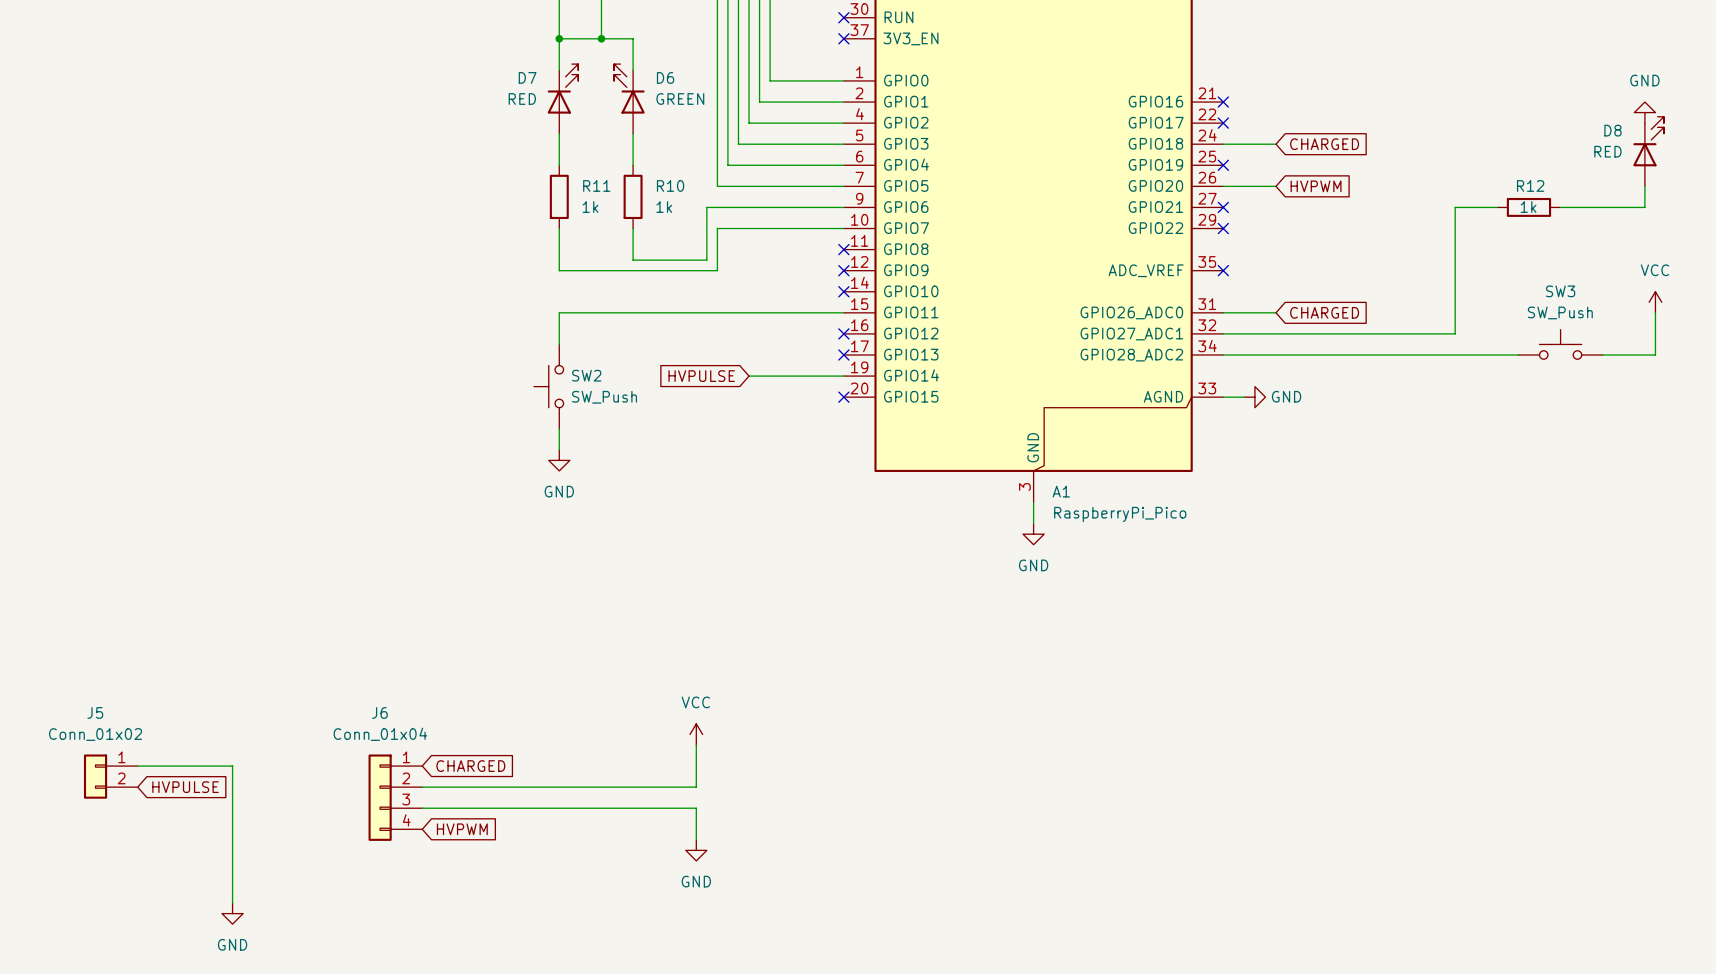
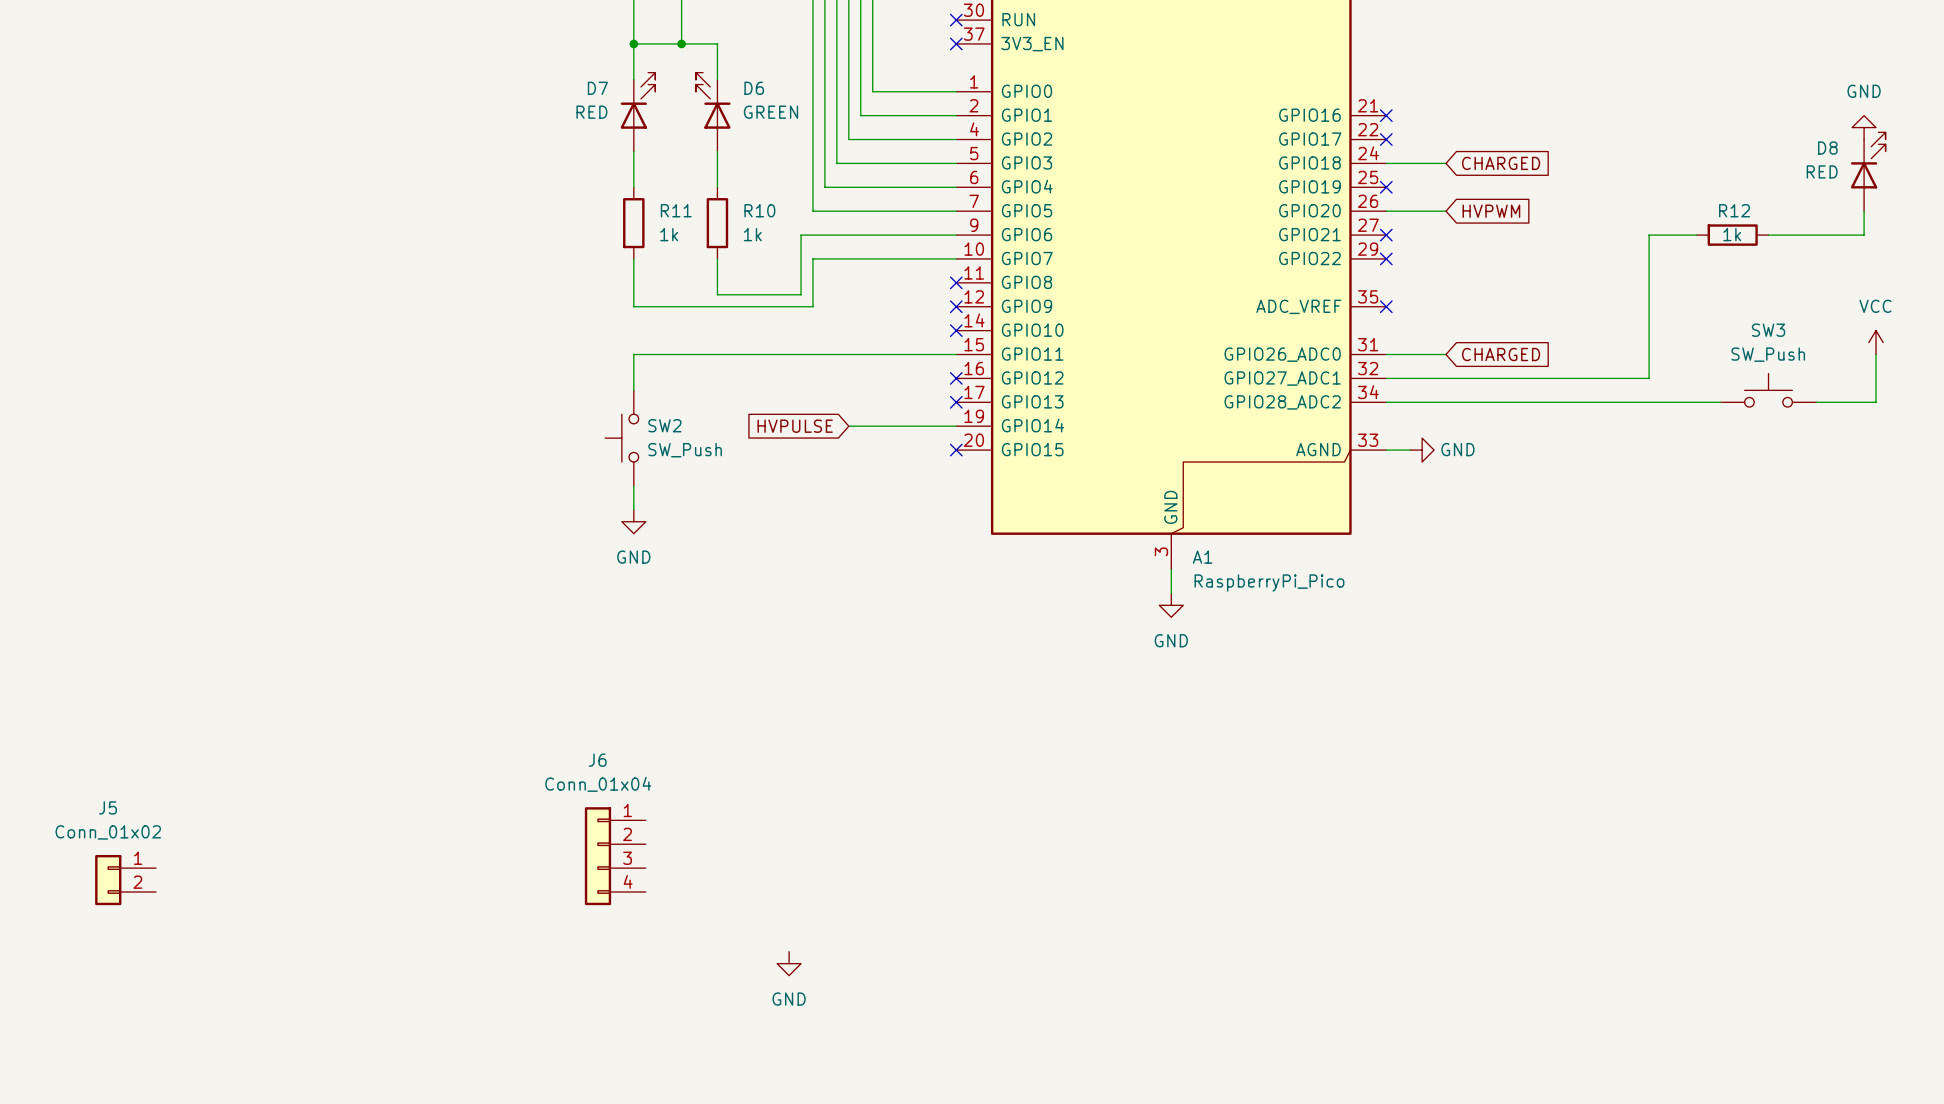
power symbol: VCC (696, 734) -> none
wire: (696, 744) (696, 787) (422, 787) -> none
wire: (137, 766) (232, 766) (232, 903) -> none
global label: CHARGED (470, 766) -> none
global label: HVPULSE (185, 787) -> none
J6 position: (395, 797) -> (615, 856)
wire: (422, 808) (696, 808) (696, 839) -> none
global label: HVPWM (462, 829) -> none
power symbol: GND (232, 913) -> none

